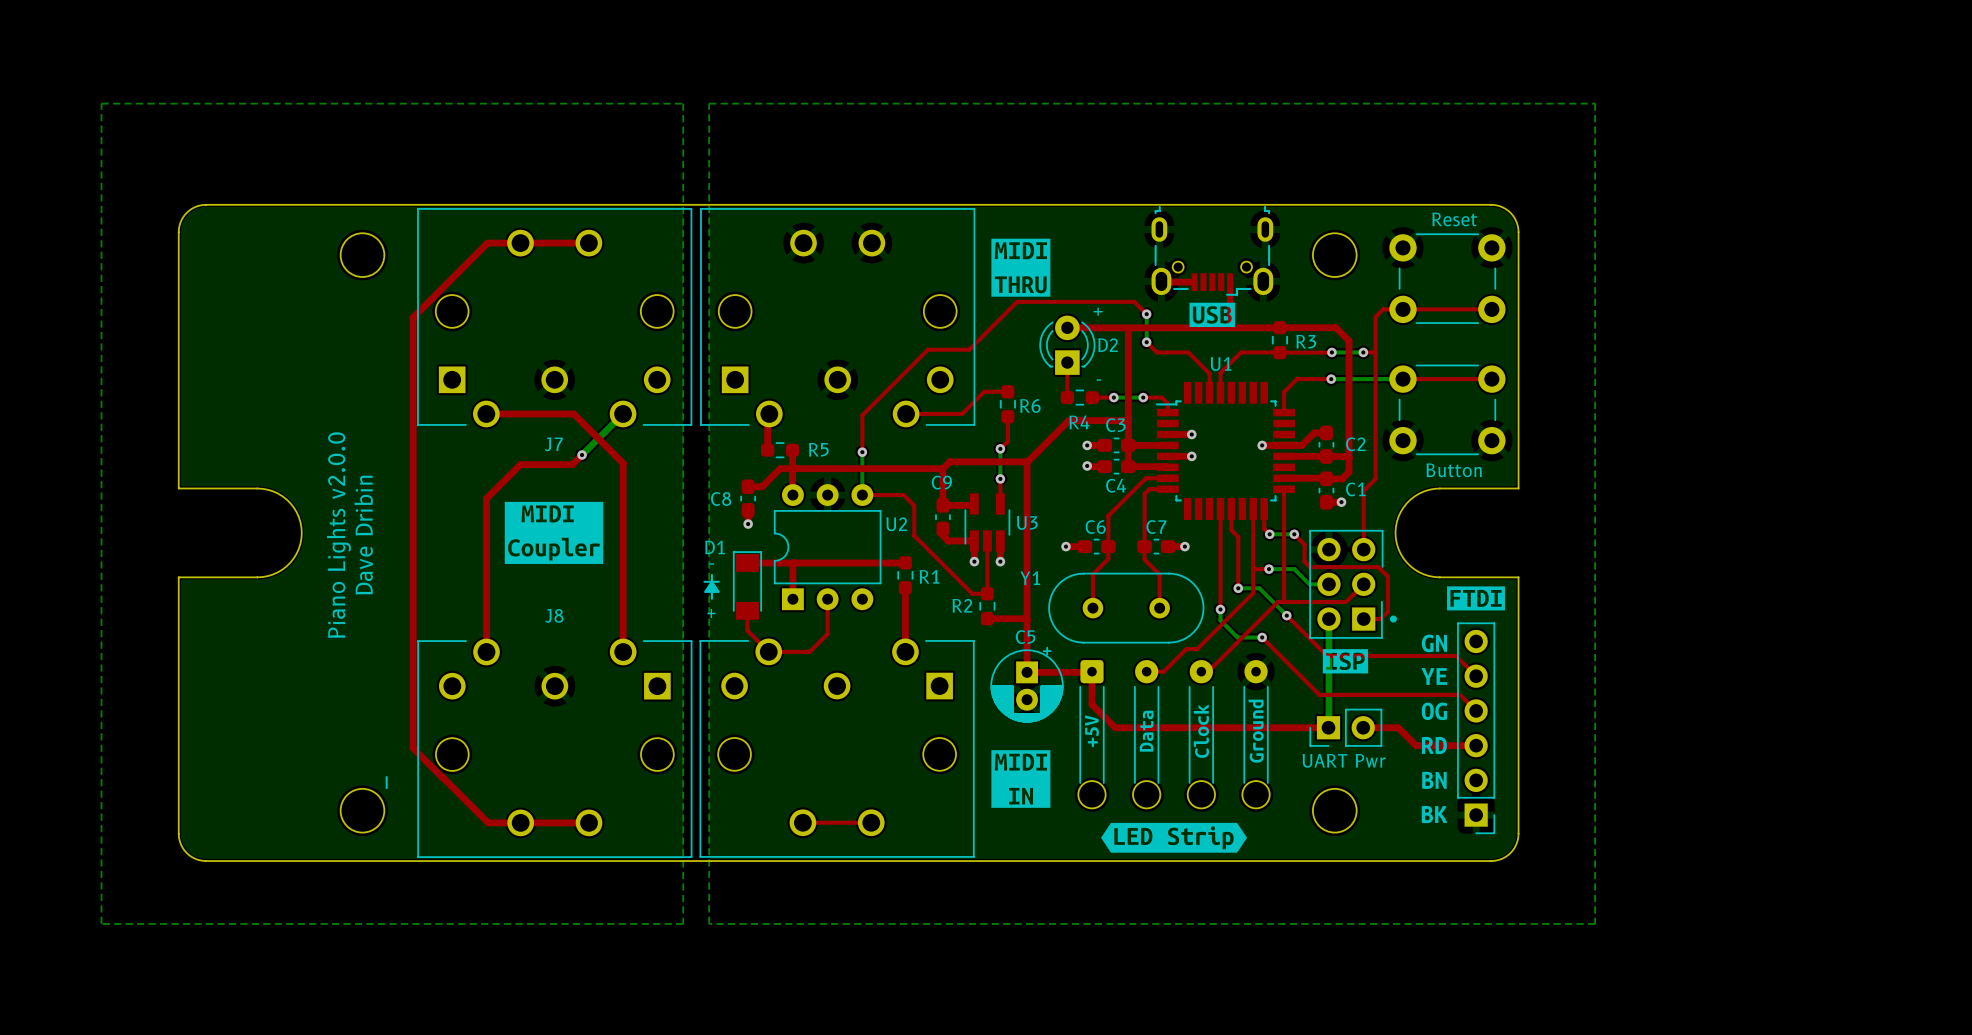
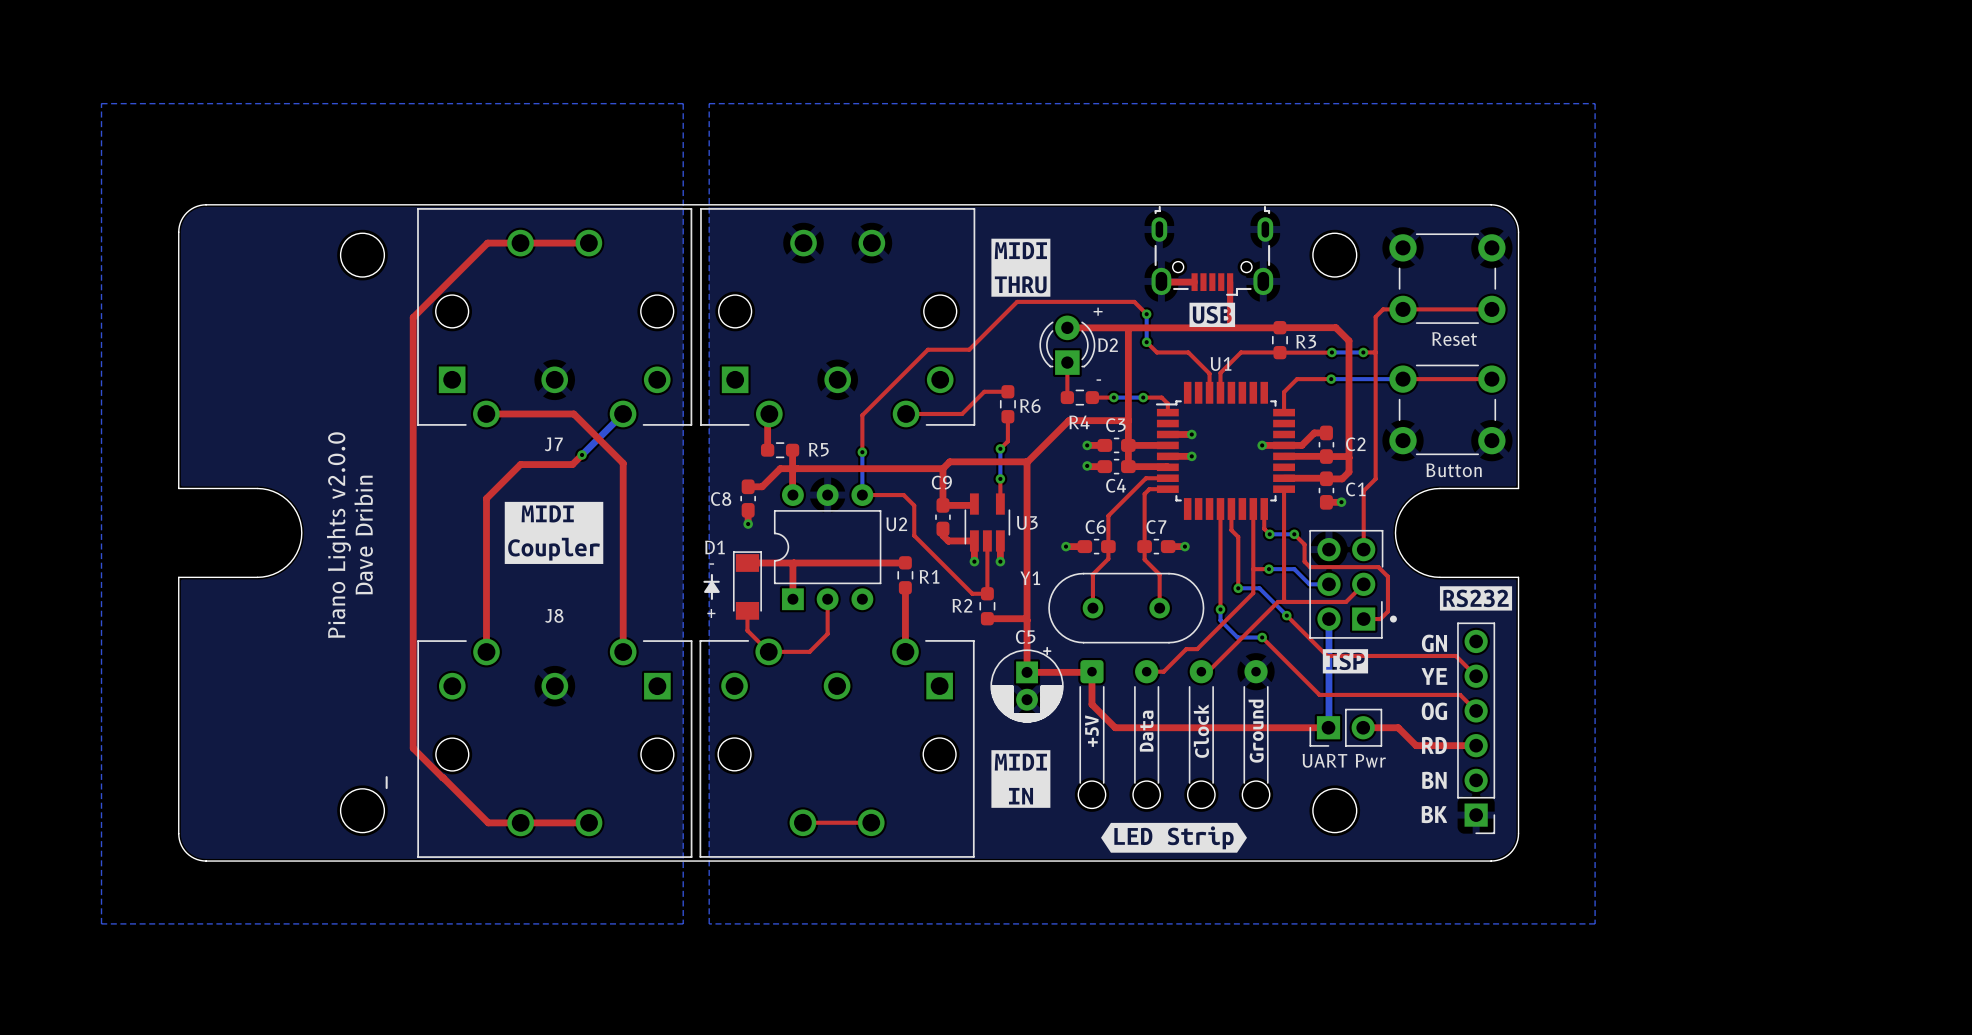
part value position: Reset (1454, 219) -> Reset (1454, 339)
drawing shape: [1447, 586, 1505, 611] -> [1439, 586, 1513, 611]

